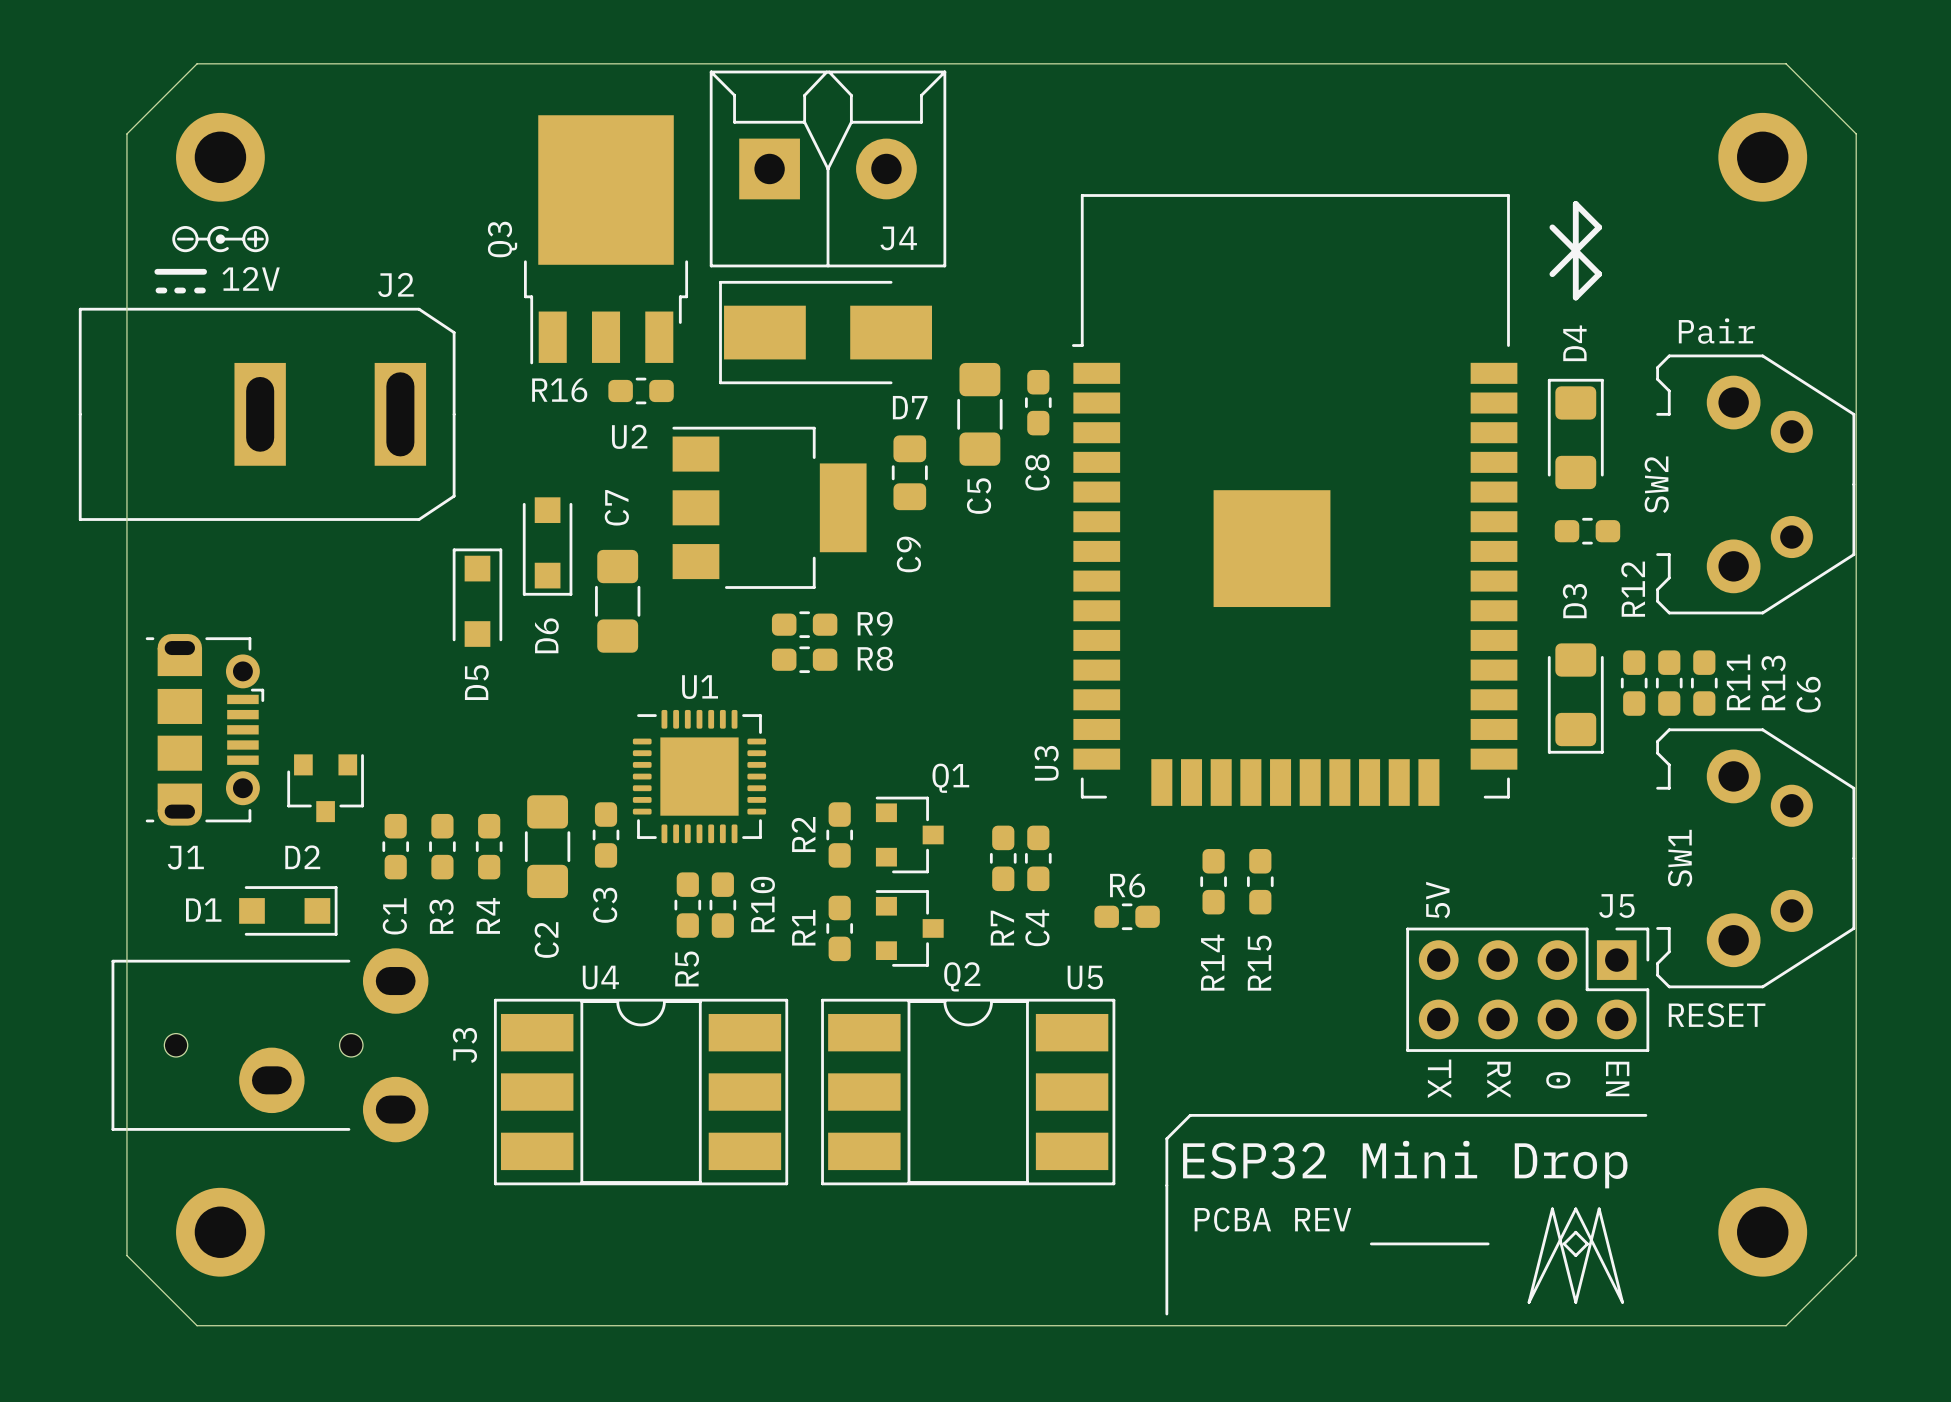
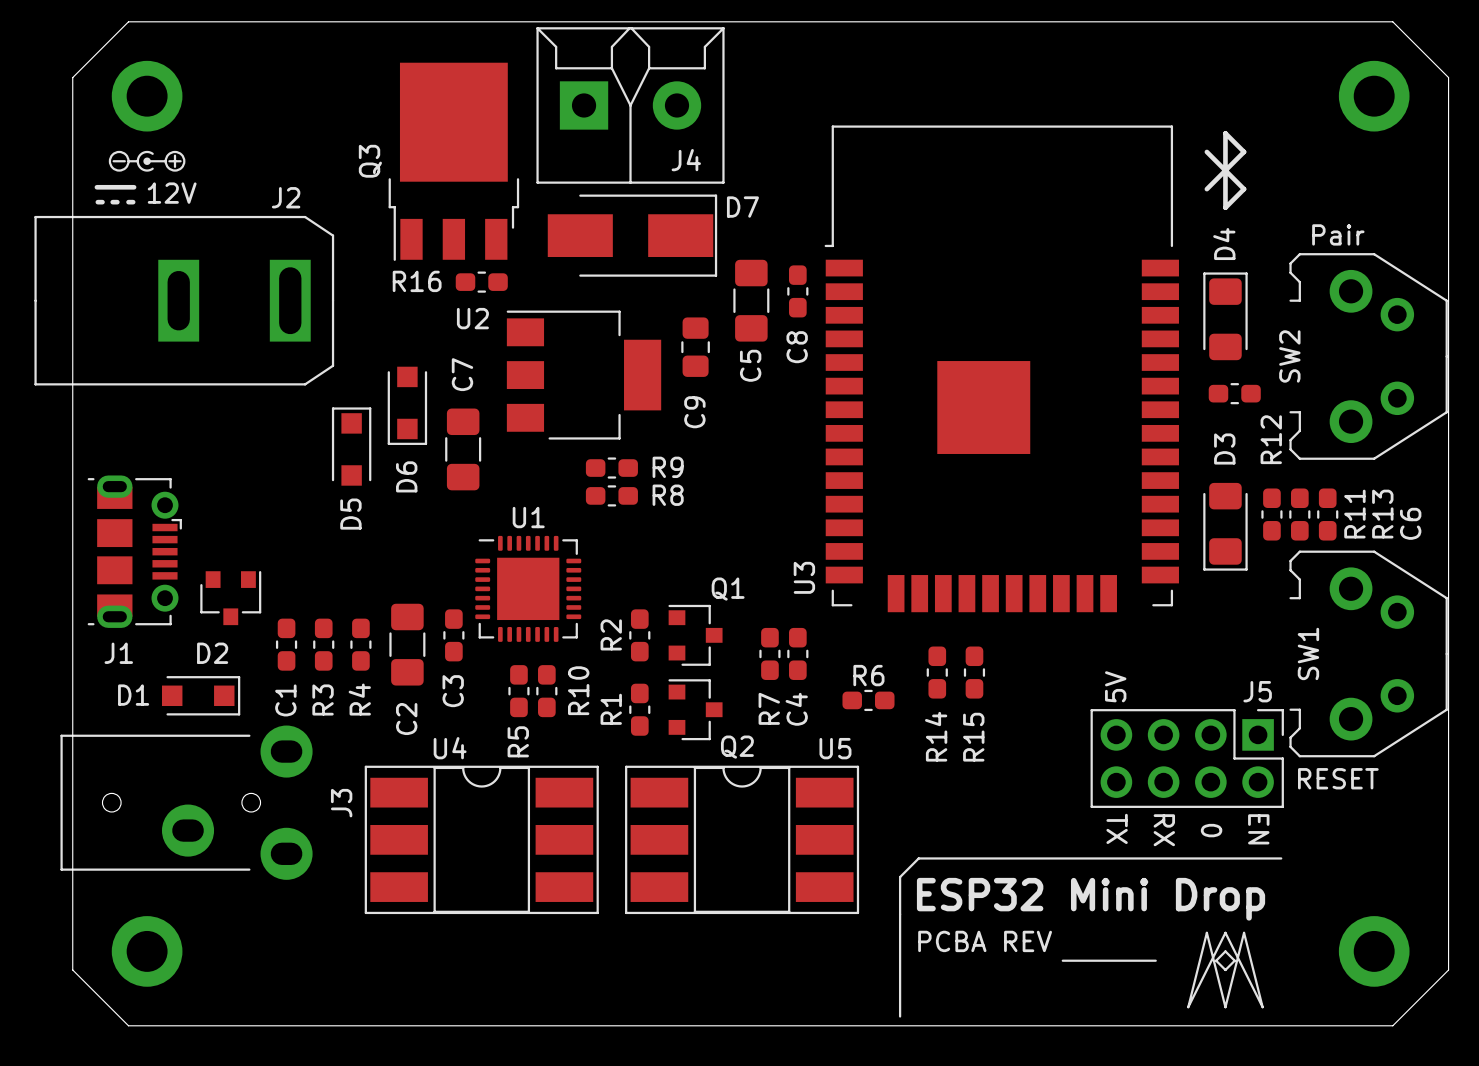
D7 rotation: 0° (825, 332) -> 180° (632, 235)
D7 name position: D7 (910, 407) -> D7 (742, 207)

